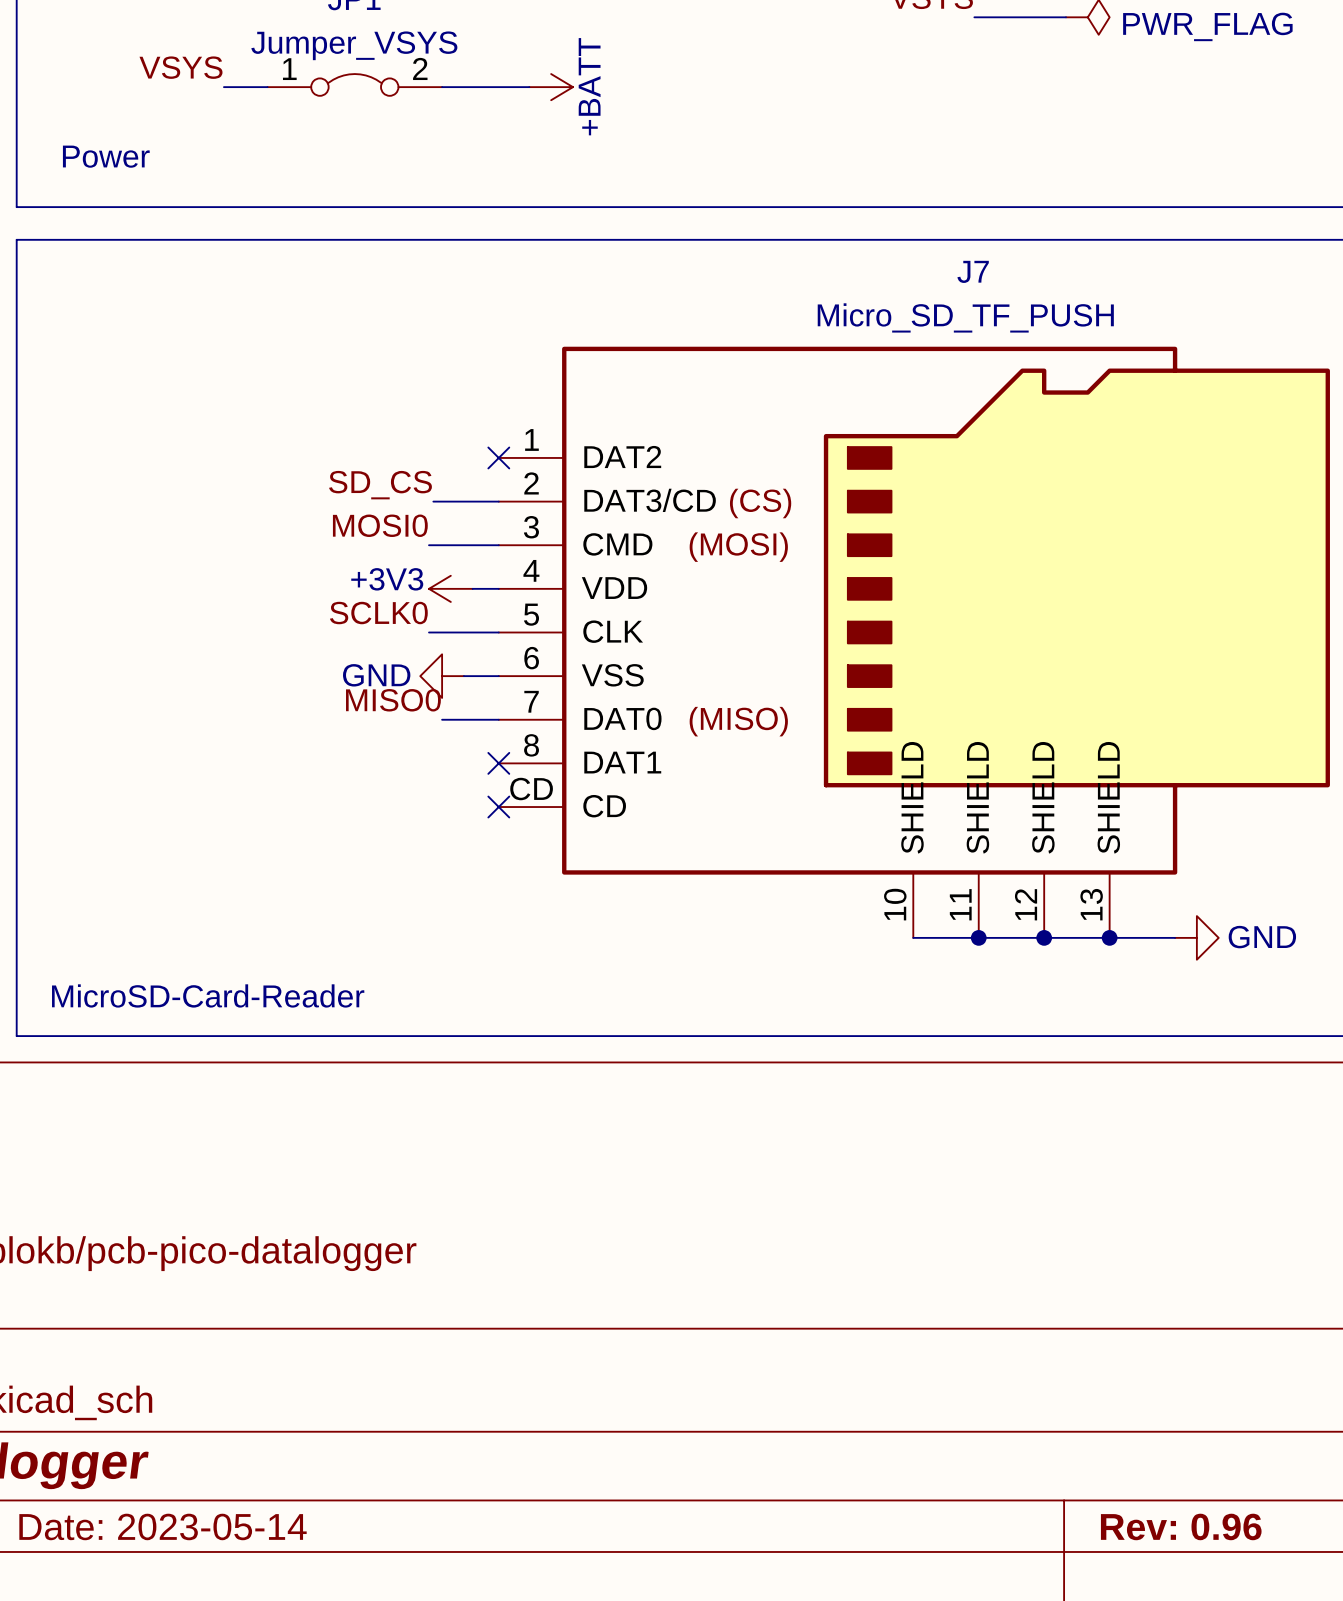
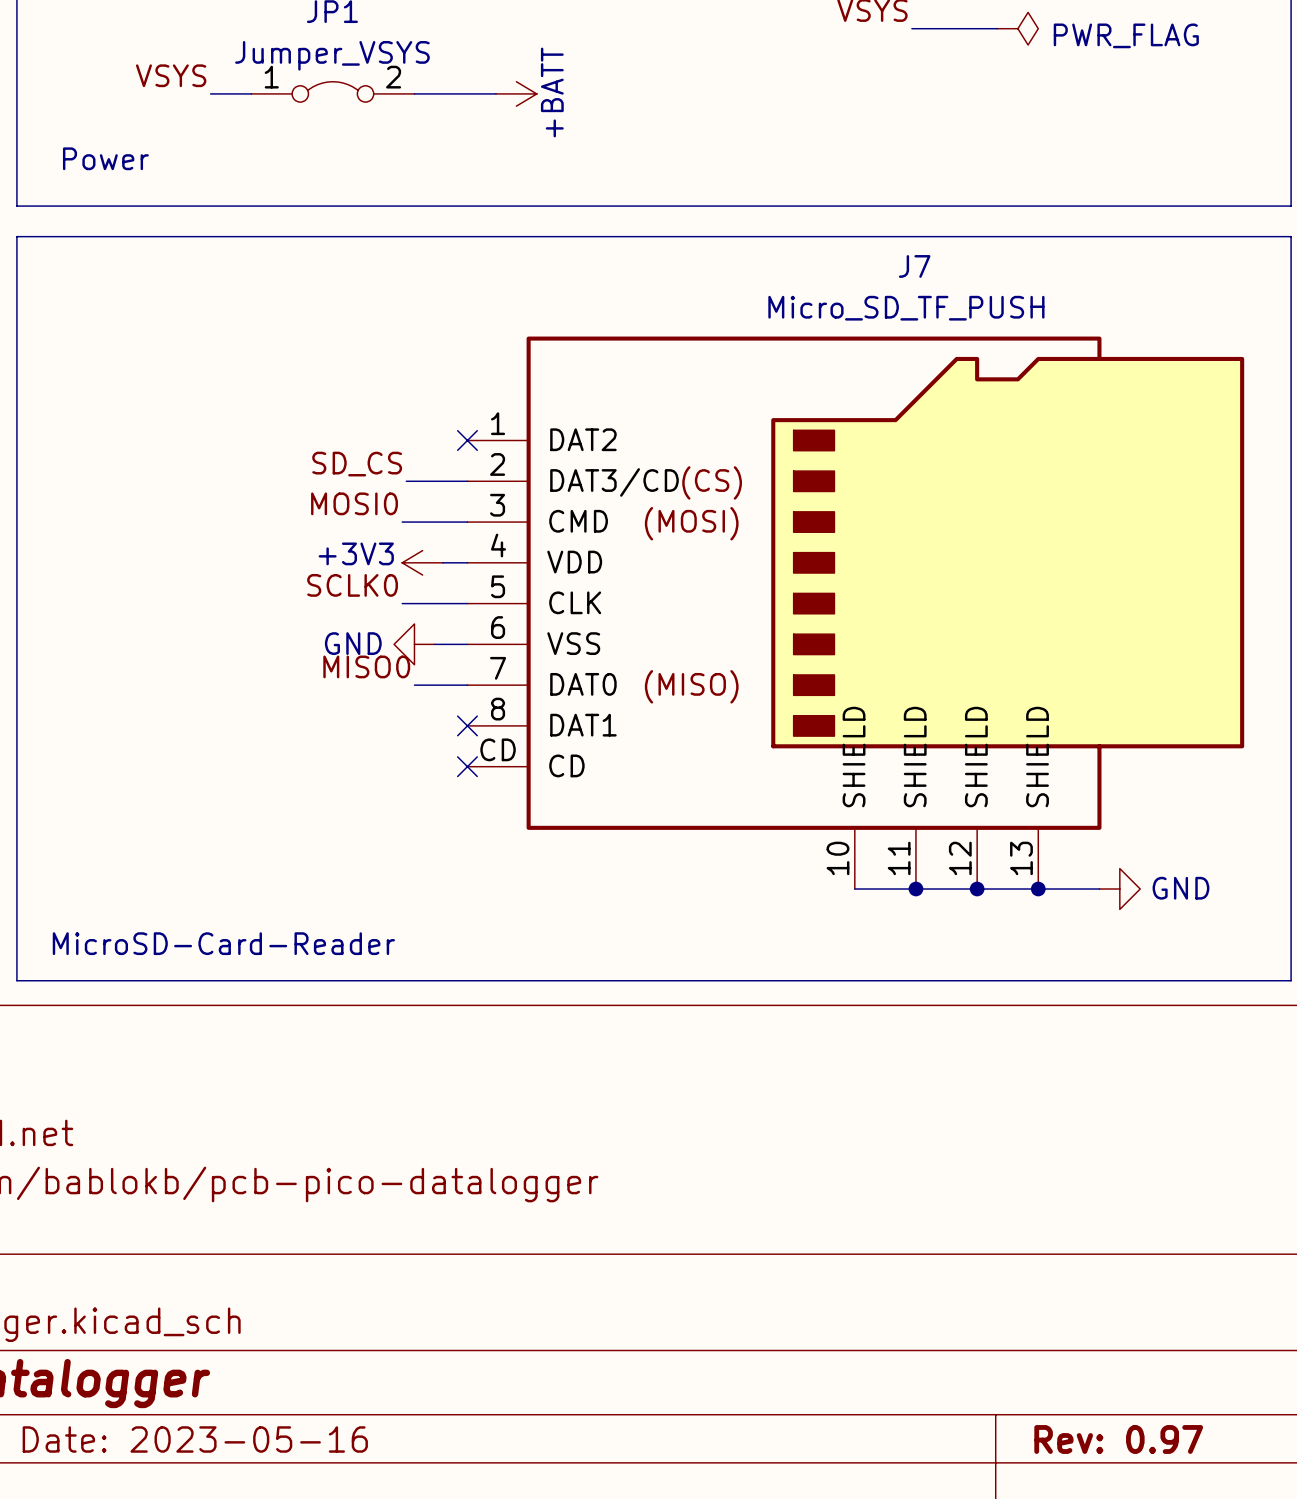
title block: Date: 2023-05-14 (163, 1526) -> Date: 2023-05-16 (195, 1439)
title block: Rev: 0.96 (1181, 1526) -> Rev: 0.97 (1118, 1439)

